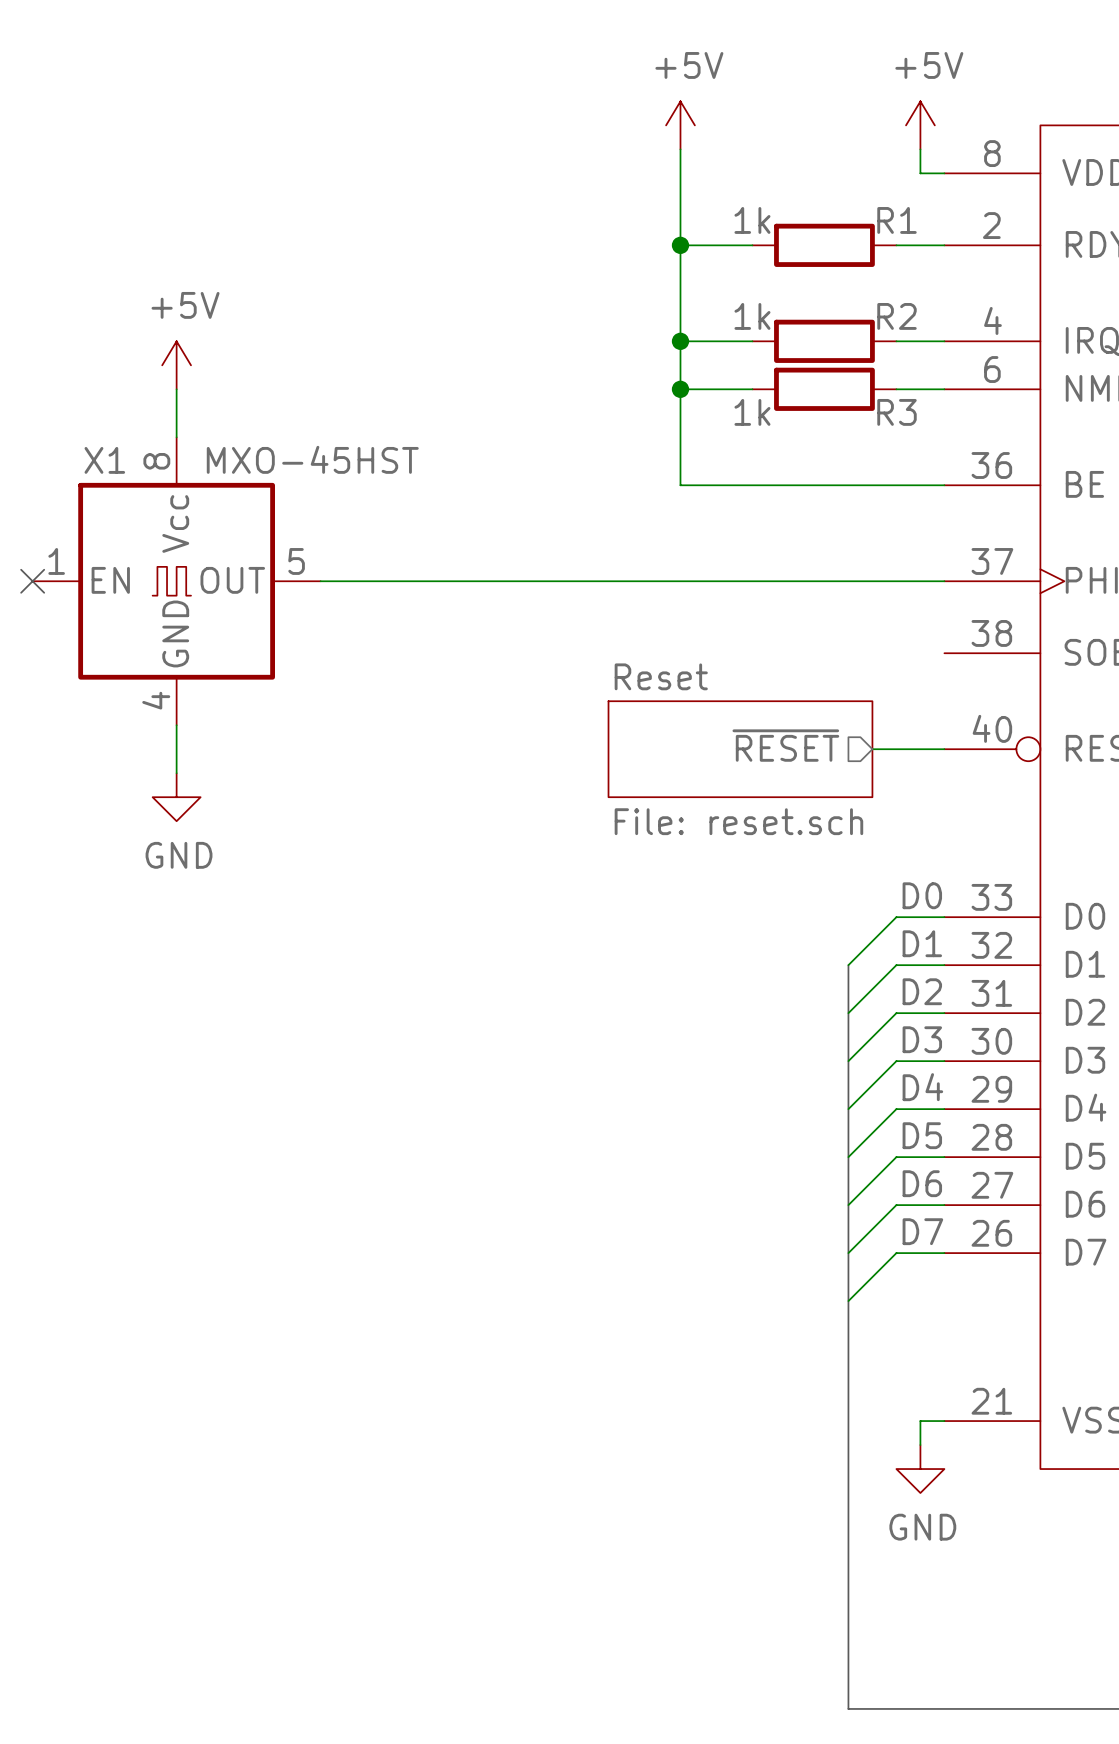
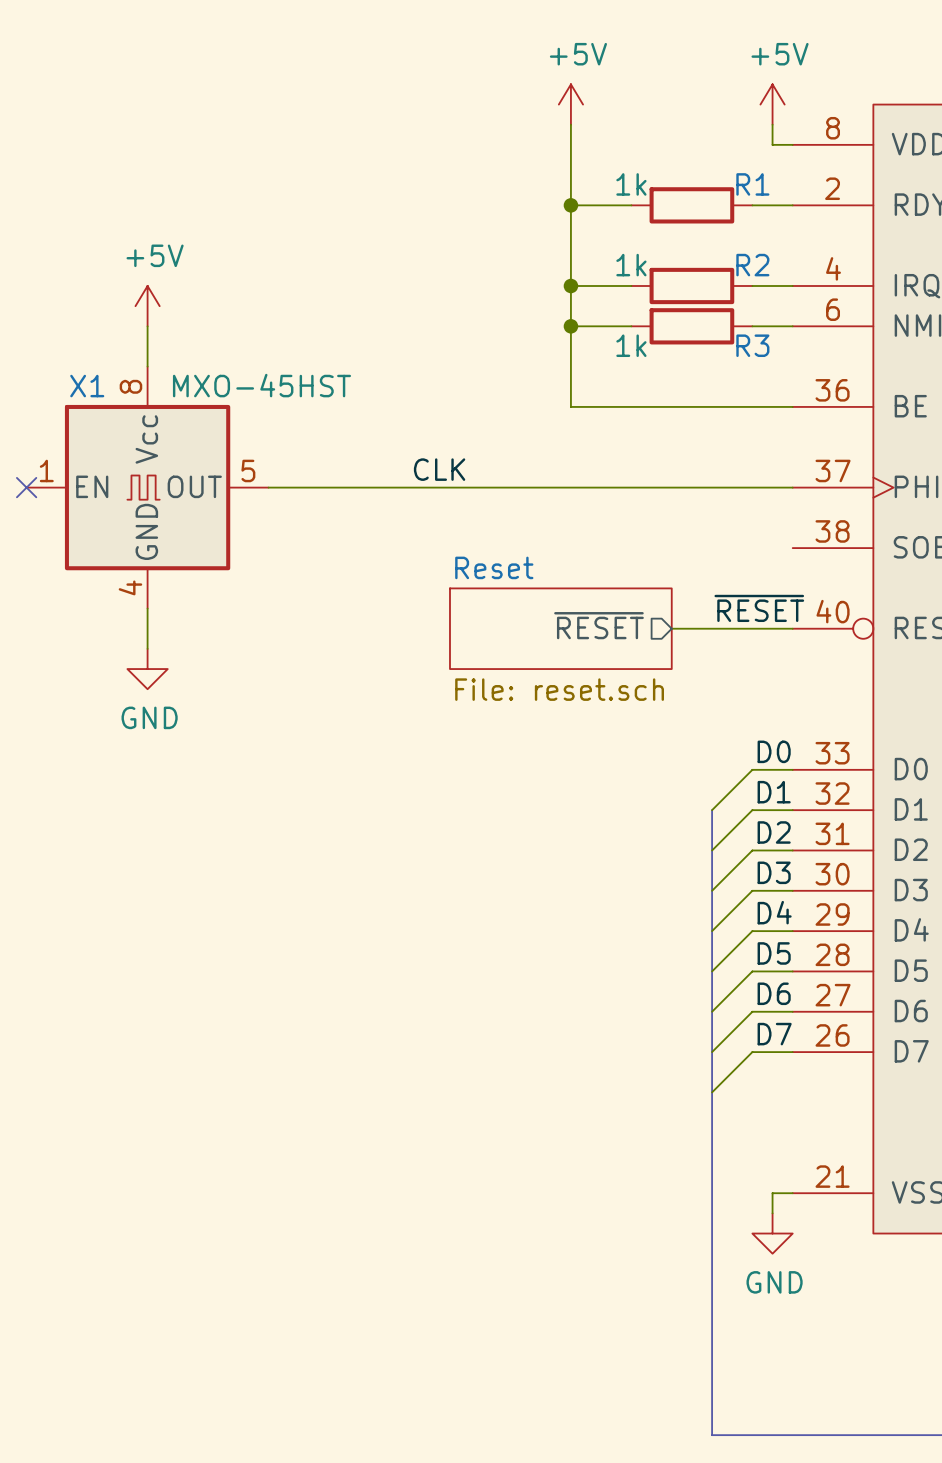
label: none -> CLK (439, 469)
label: none -> ~{RESET} (759, 608)
sheet pin position: ~{RESET} (785, 745) -> ~{RESET} (599, 625)
sheet Reset position: (740, 749) -> (560, 628)
wire: none -> (671, 628) (732, 628)

